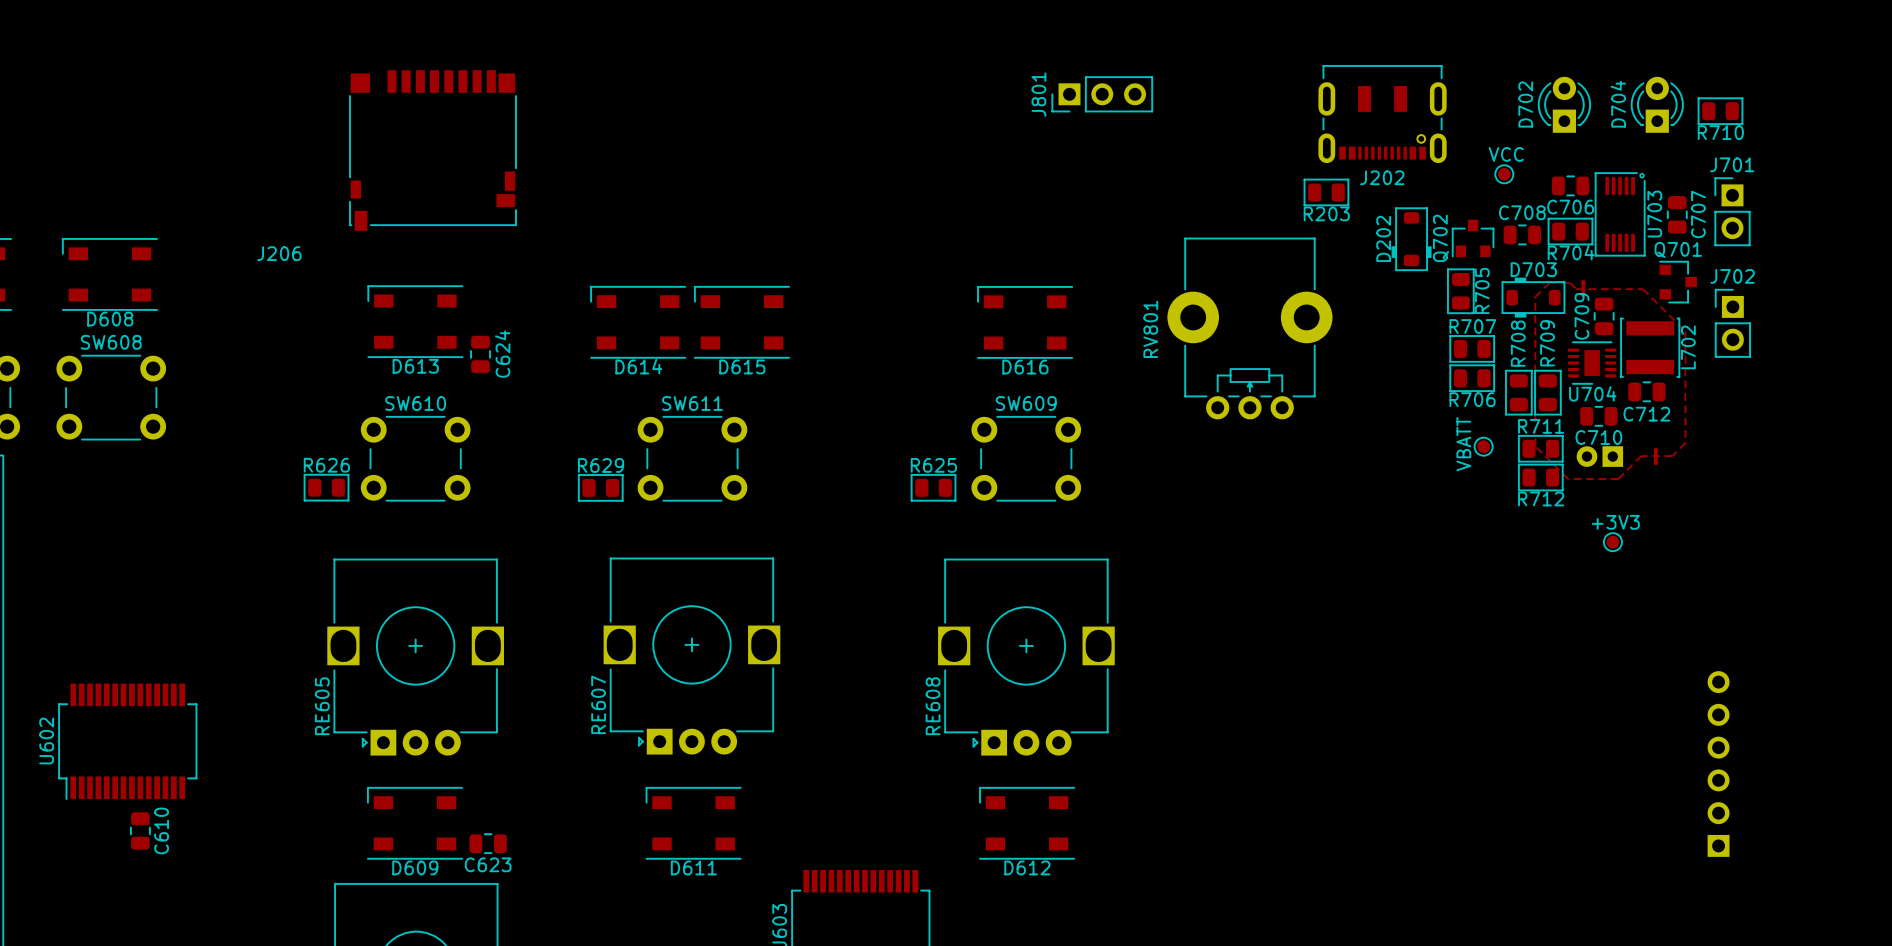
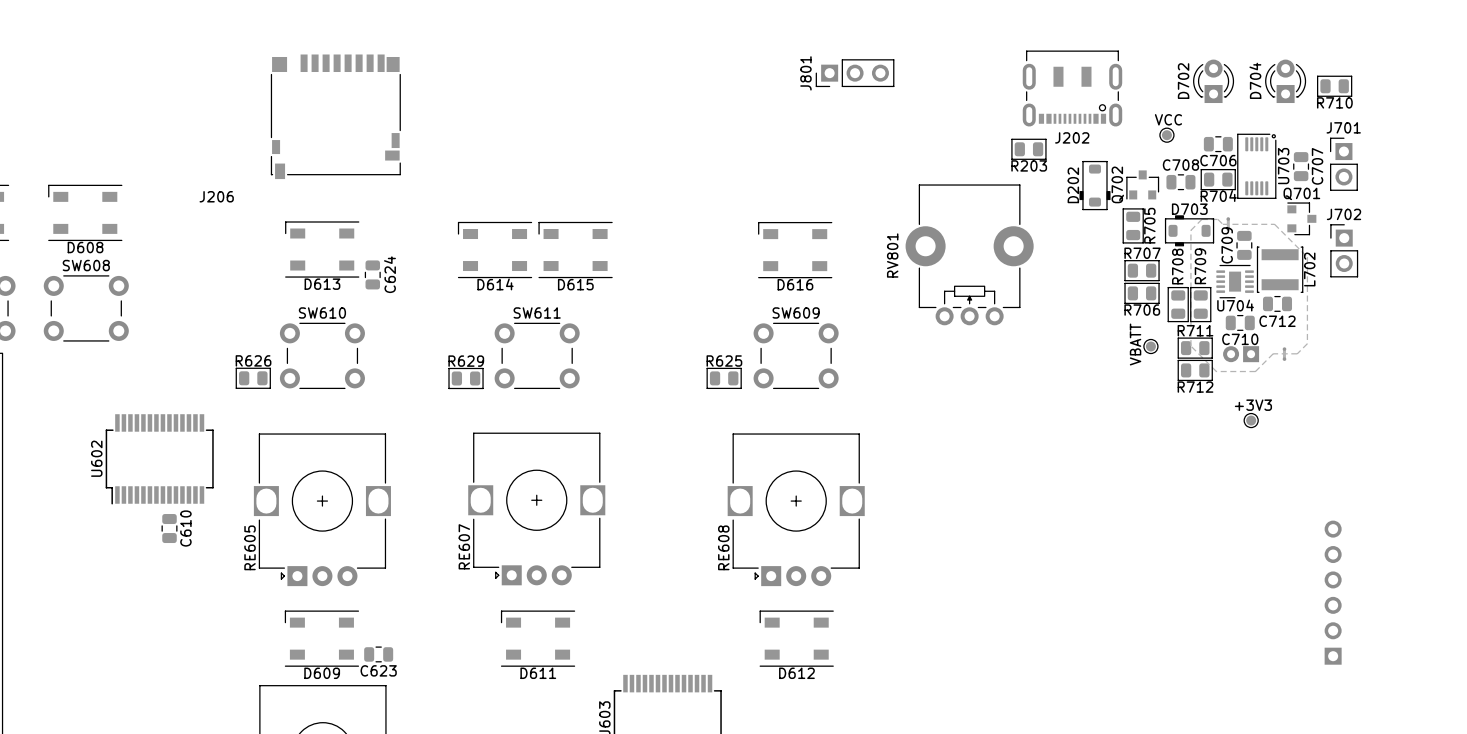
U602 position: (127, 741) -> (159, 459)
C610 position: (140, 830) -> (169, 528)

